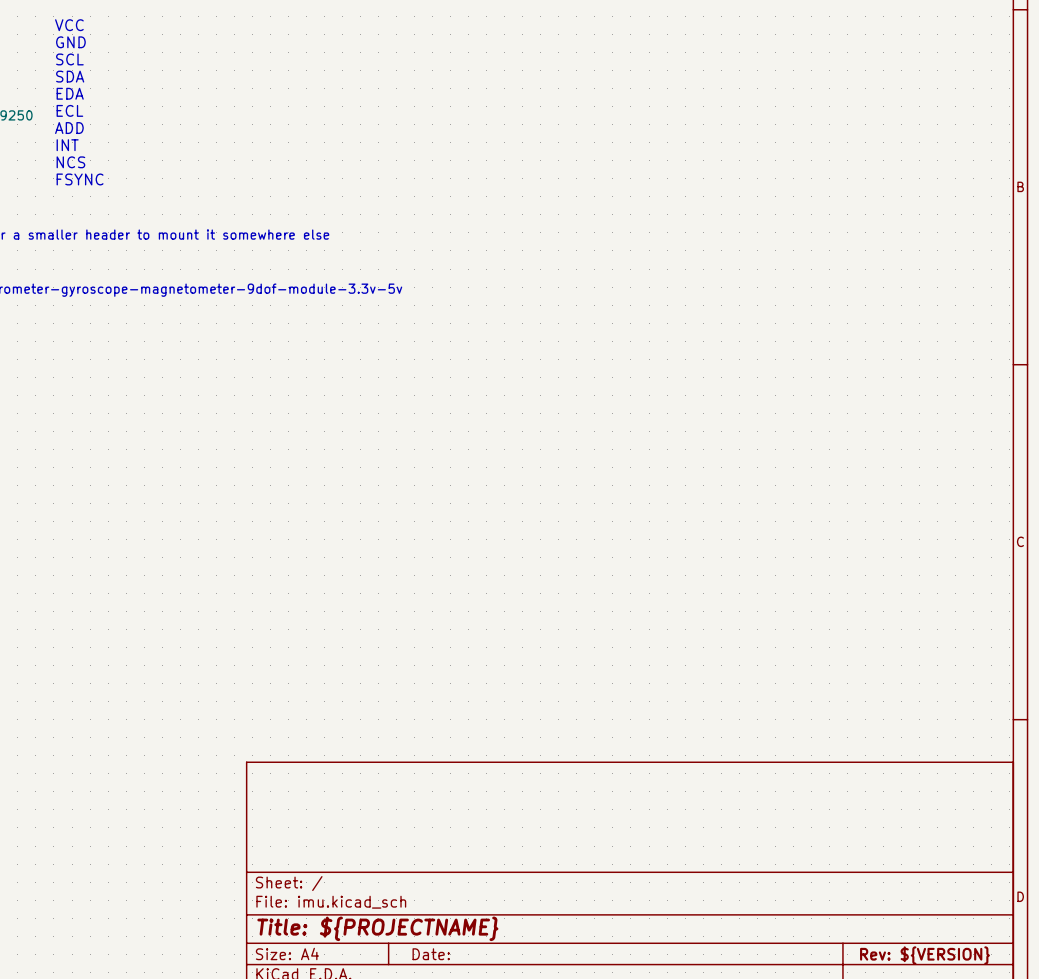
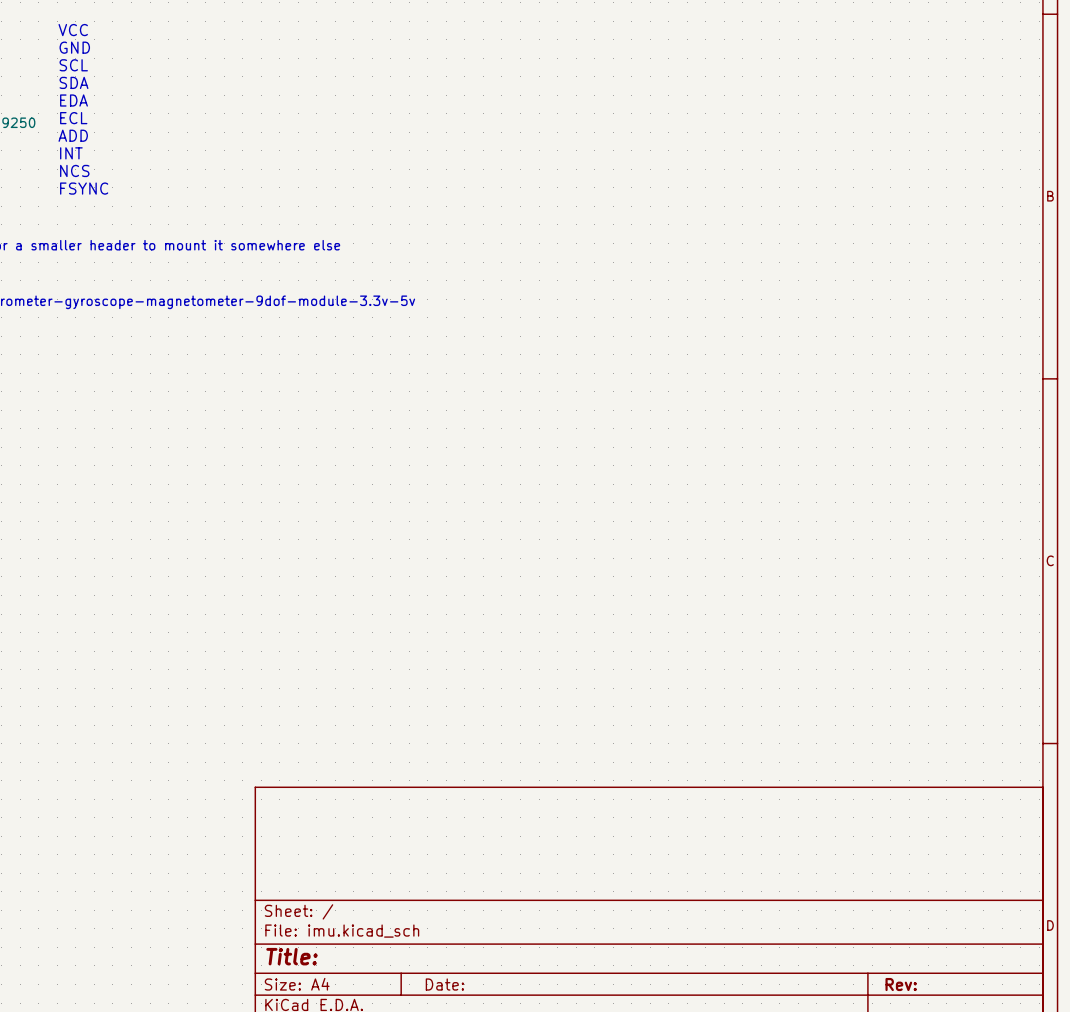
title block: Title: ${PROJECTNAME} (377, 928) -> Title: (292, 956)
title block: Rev: ${VERSION} (924, 955) -> Rev: (901, 984)

